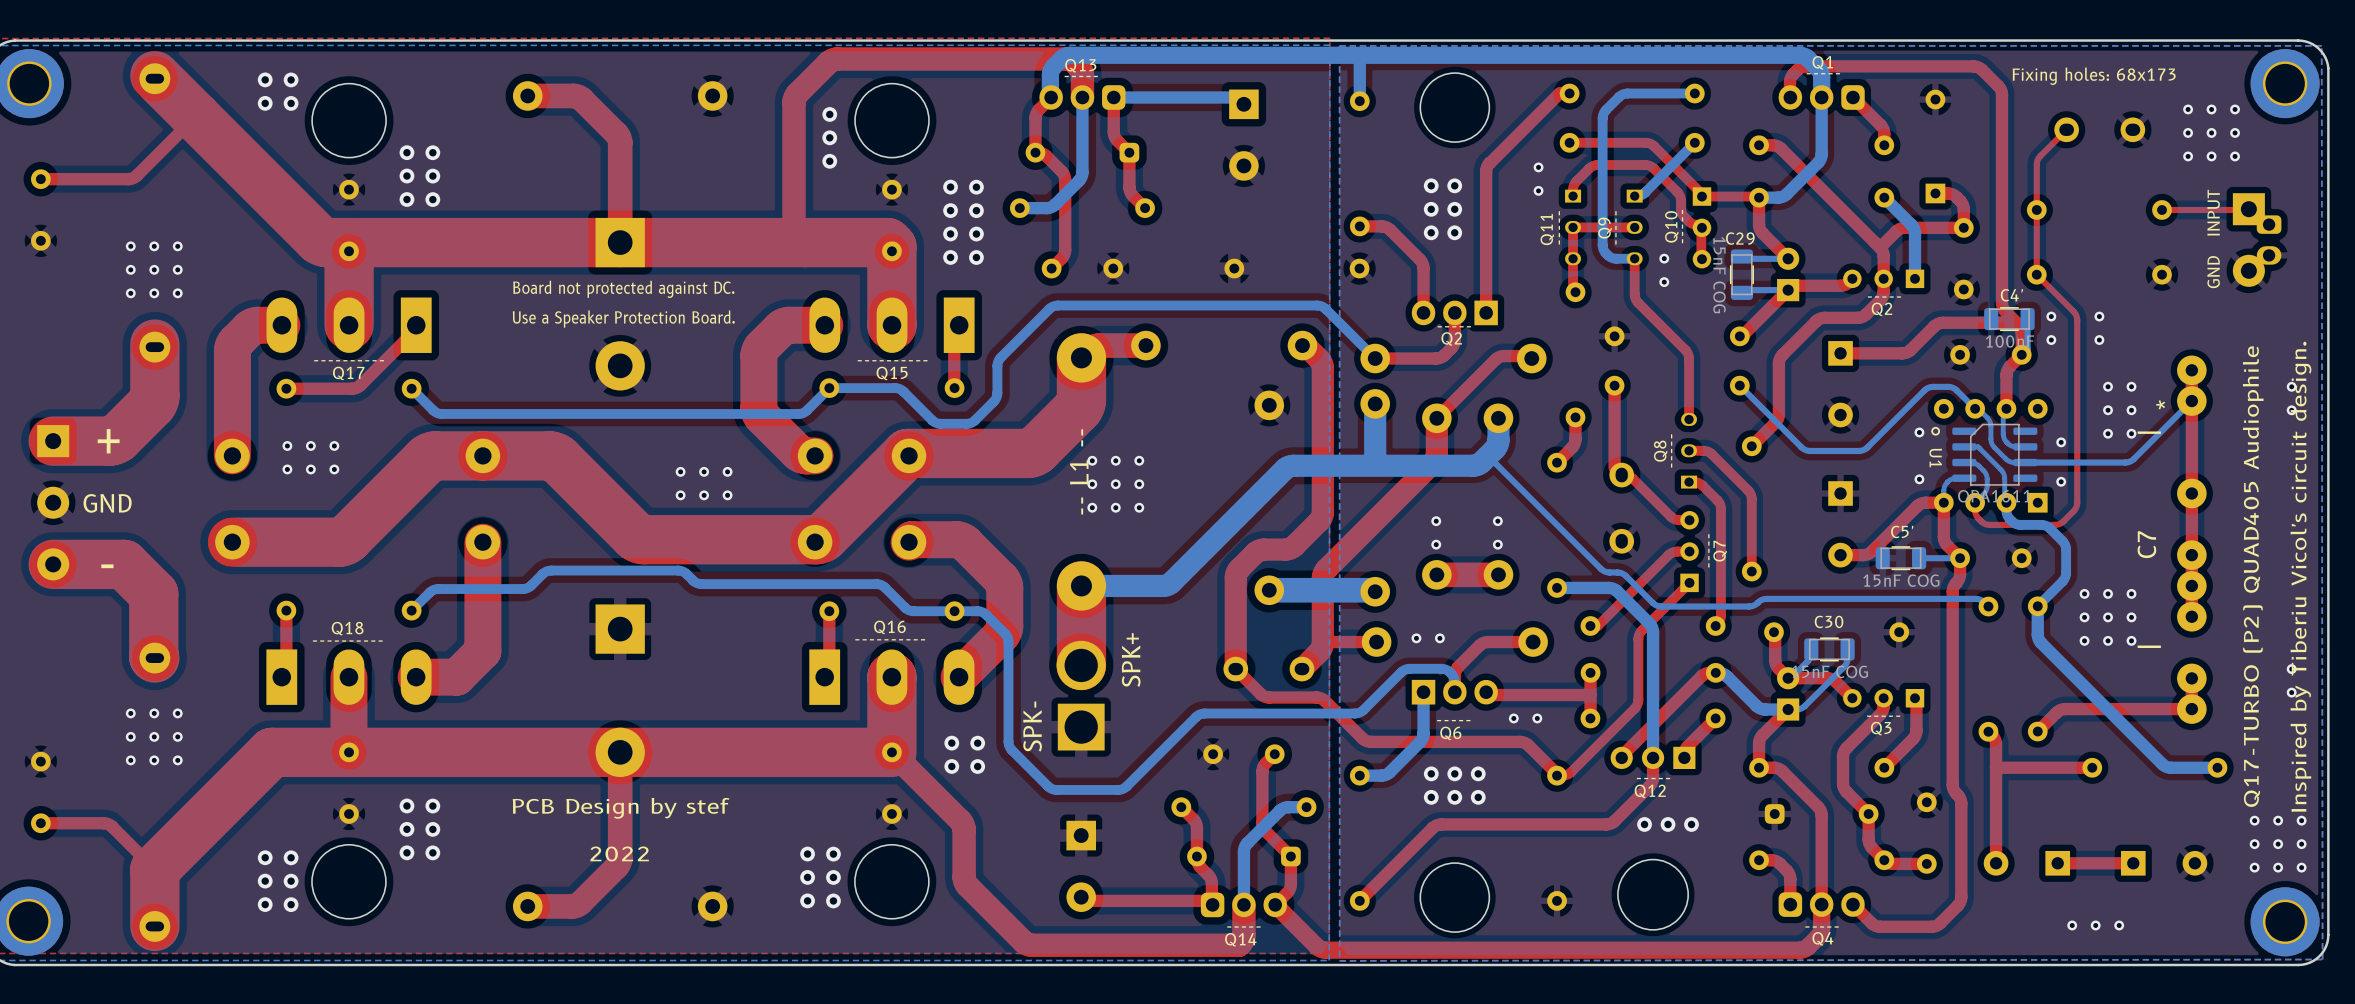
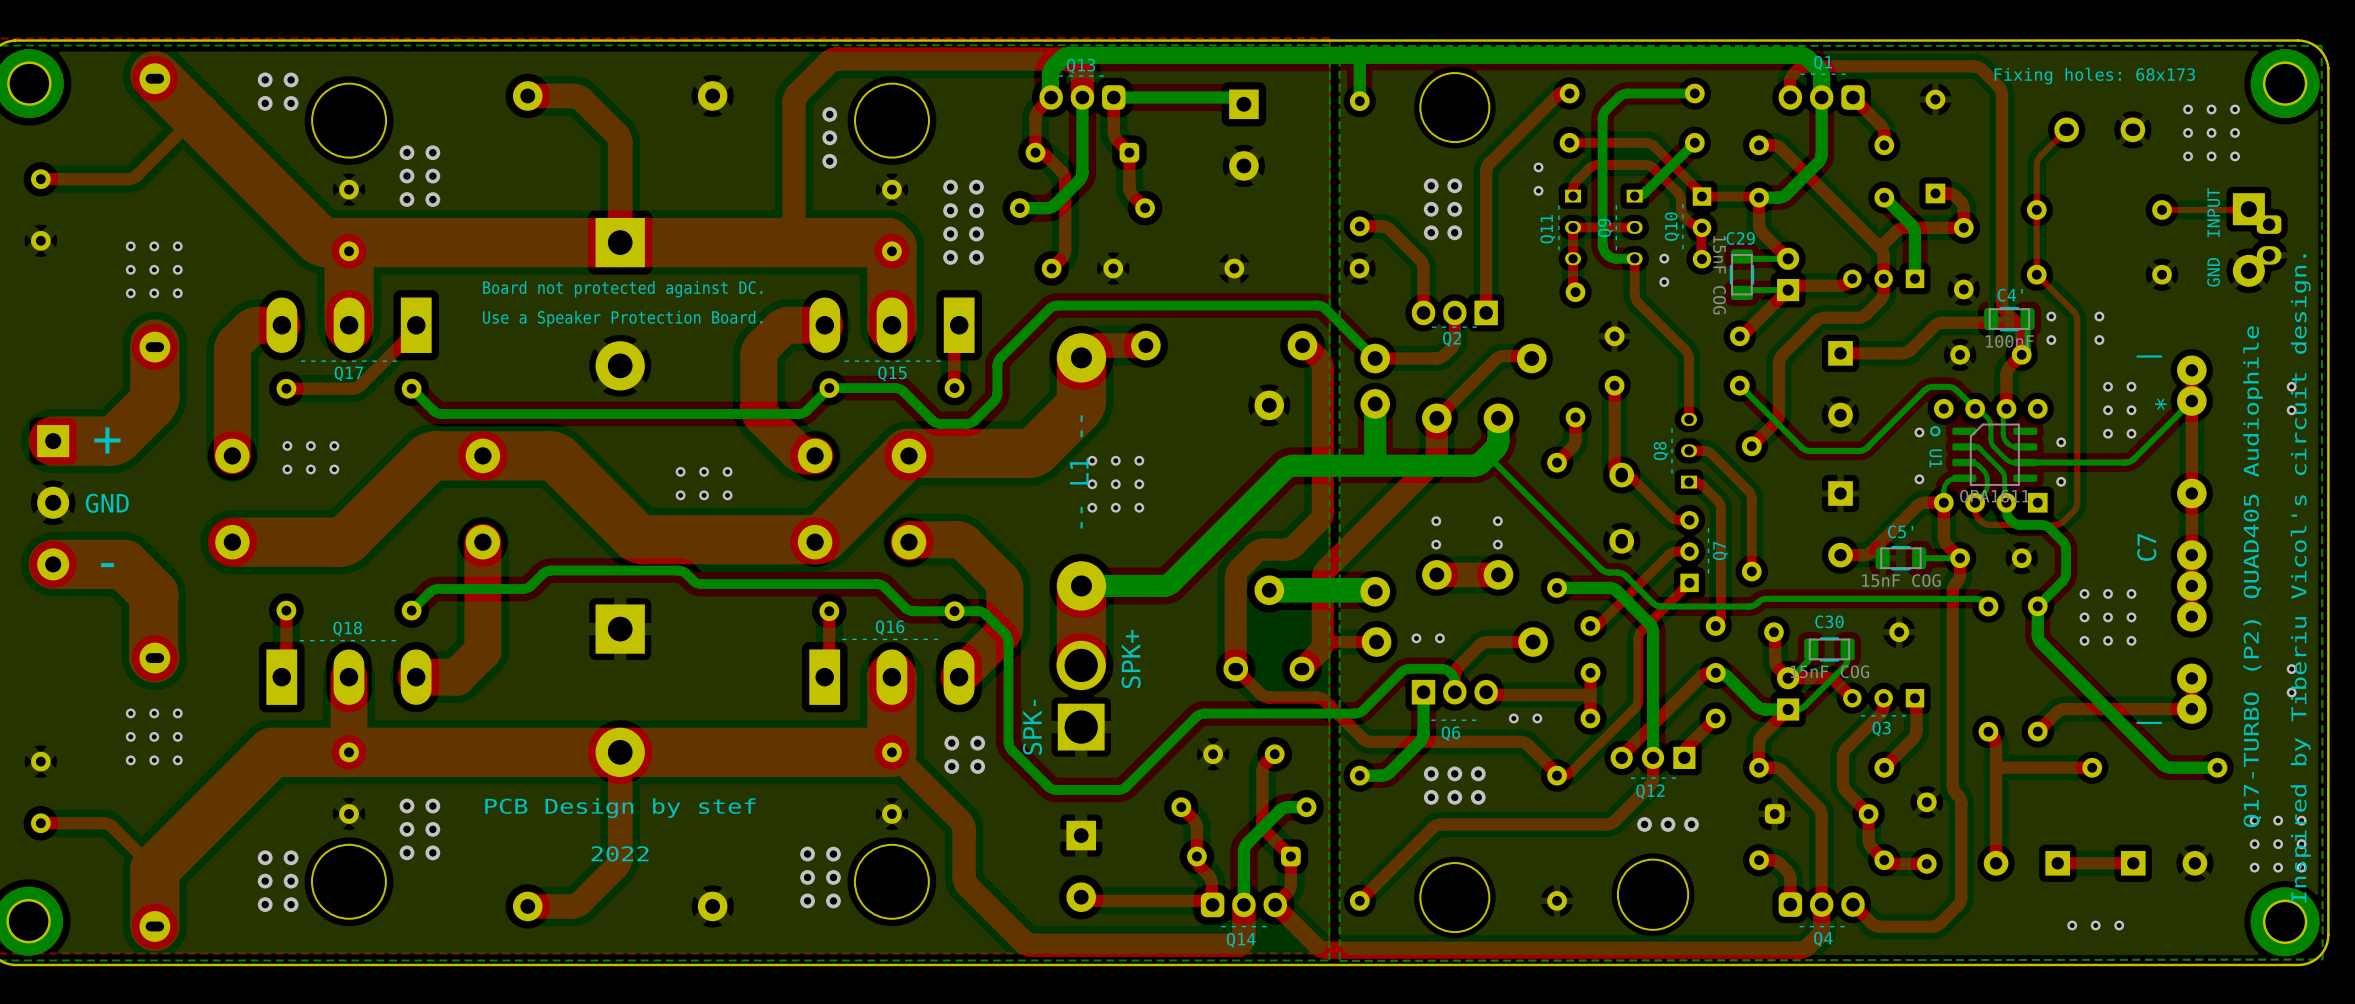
text: ----- (1884, 297) -> none
text: Q2 (1881, 309) -> none

